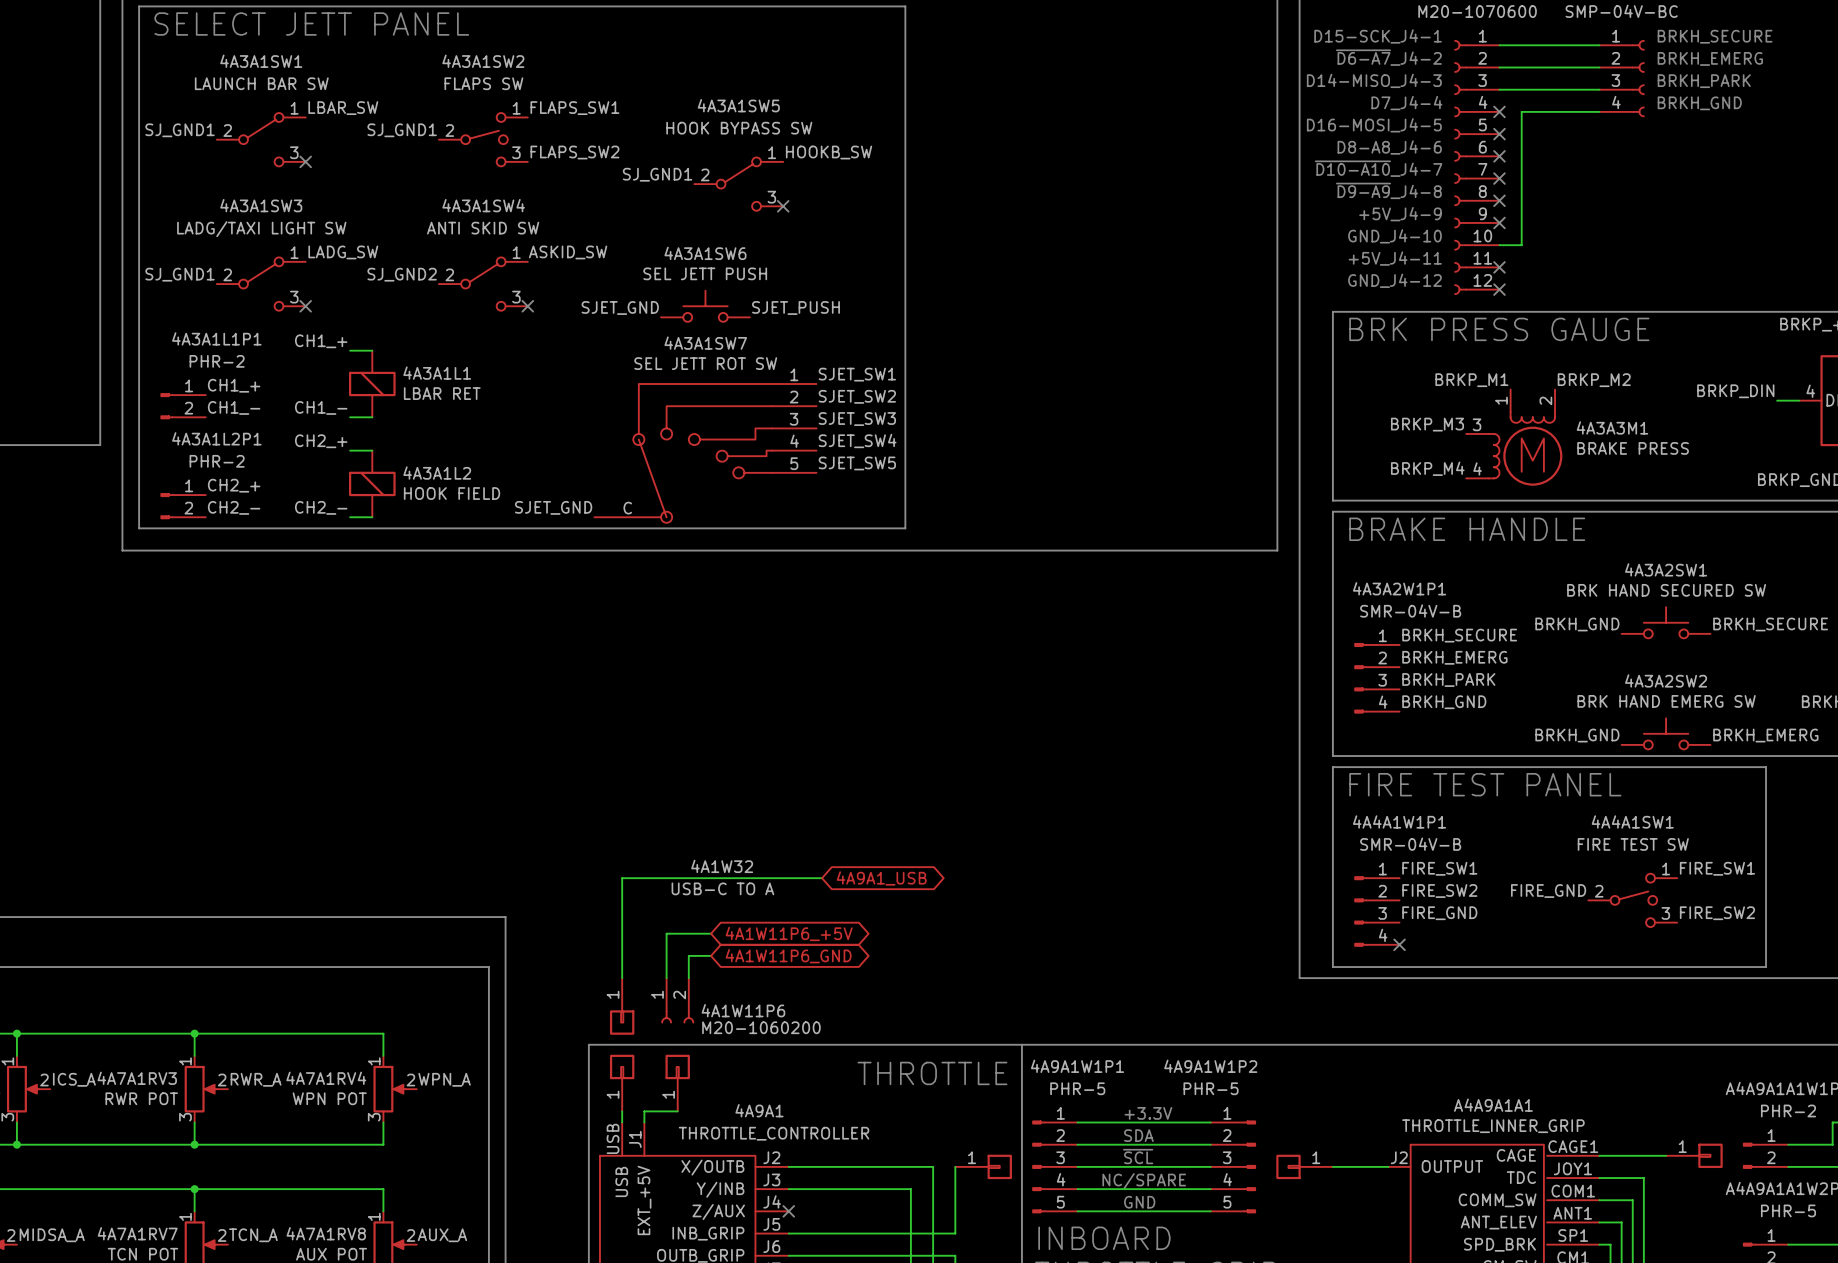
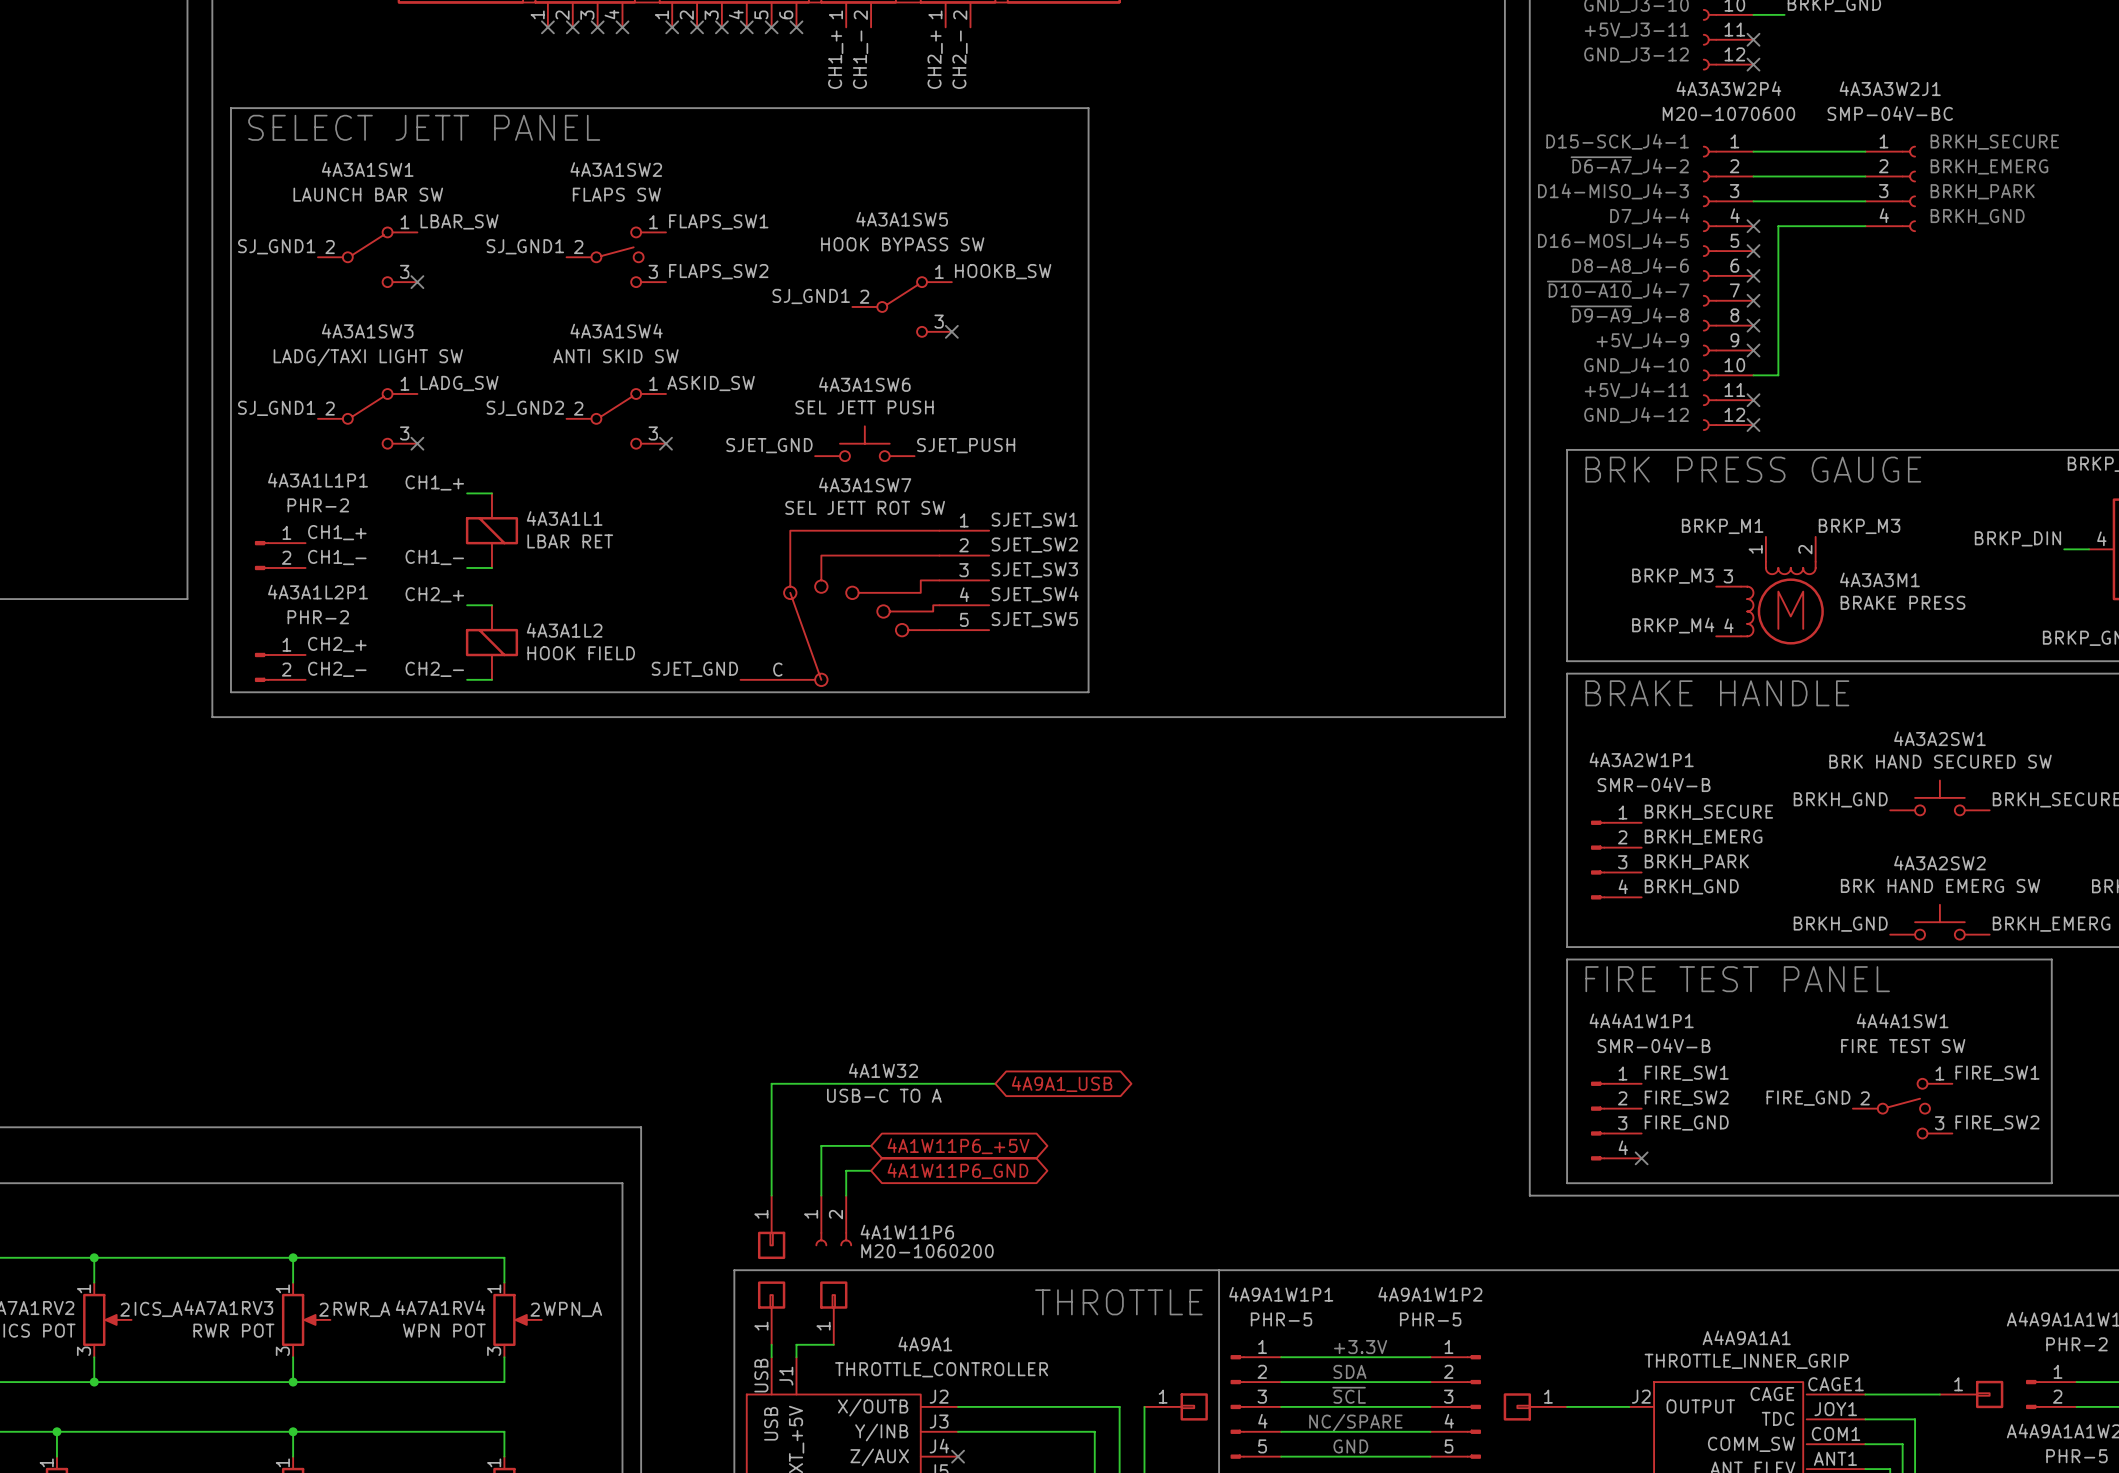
label: BRKP_M2 (1594, 380) -> BRKP_M3 (1859, 526)

